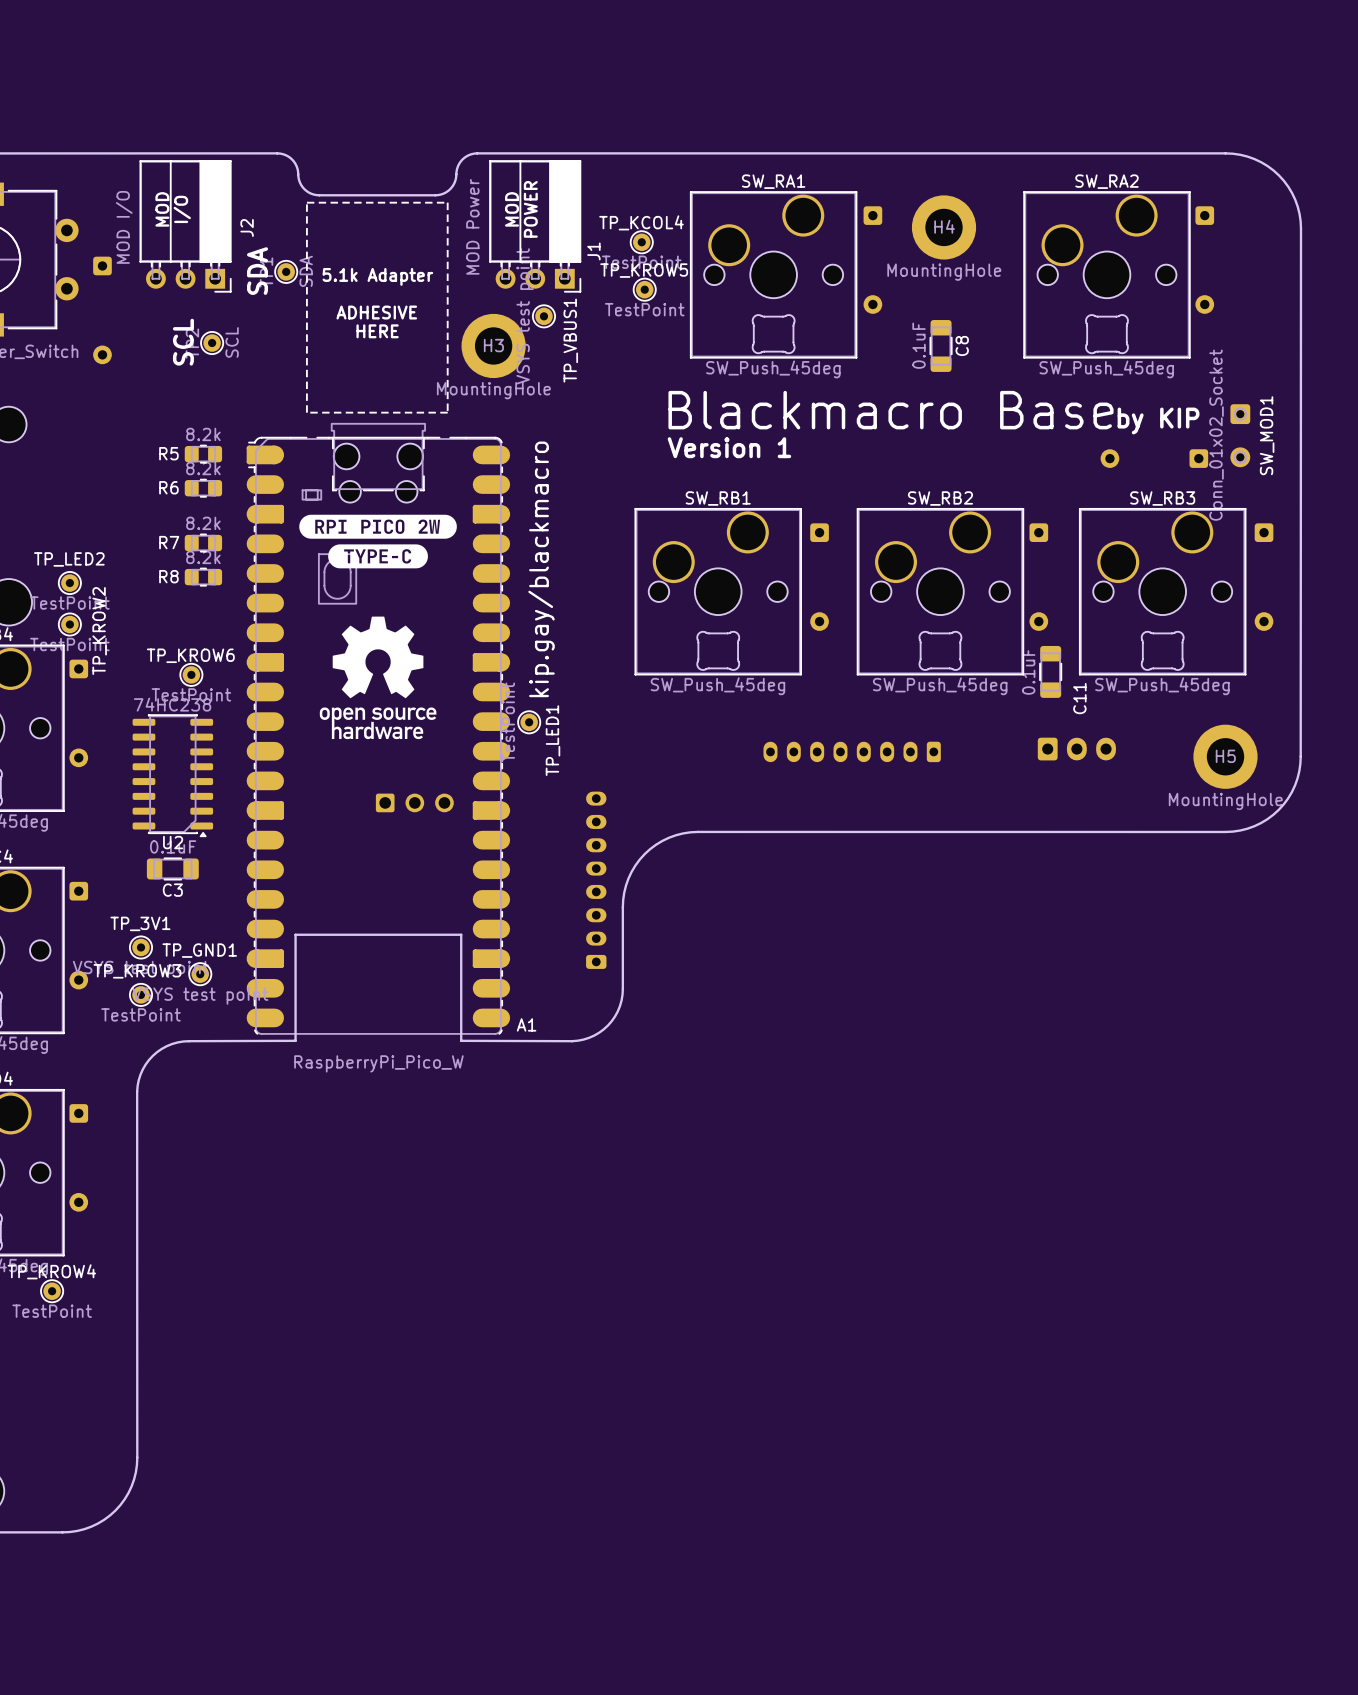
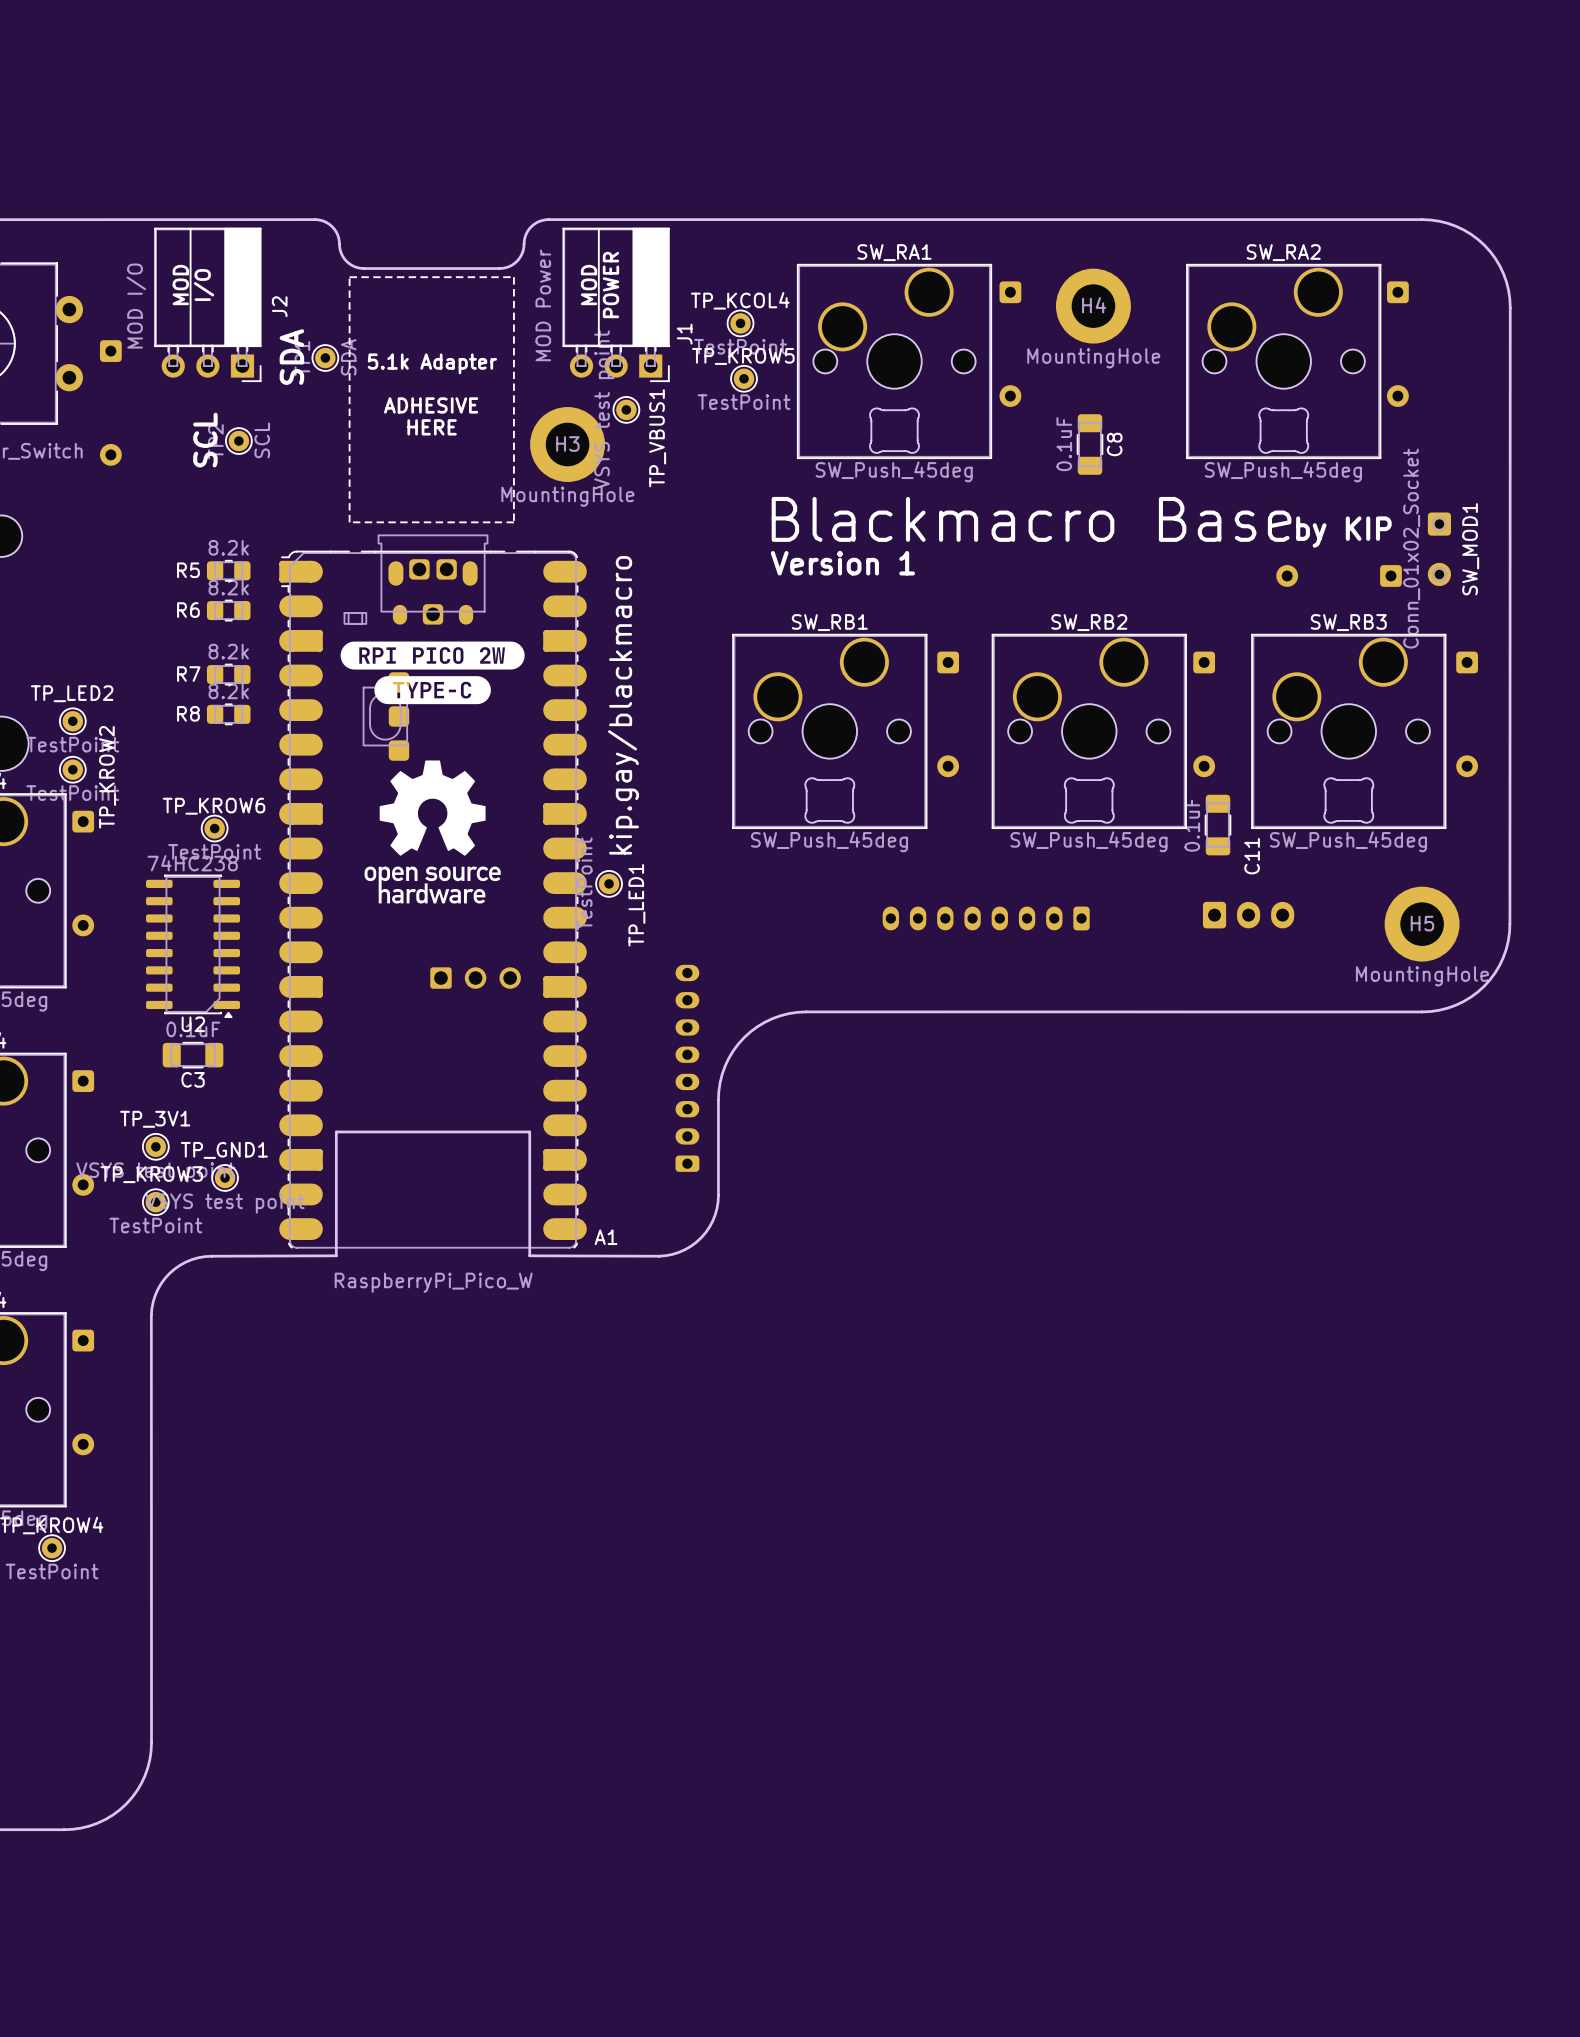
A1 footprint: [246, 423, 511, 1035] -> [279, 534, 587, 1249]

